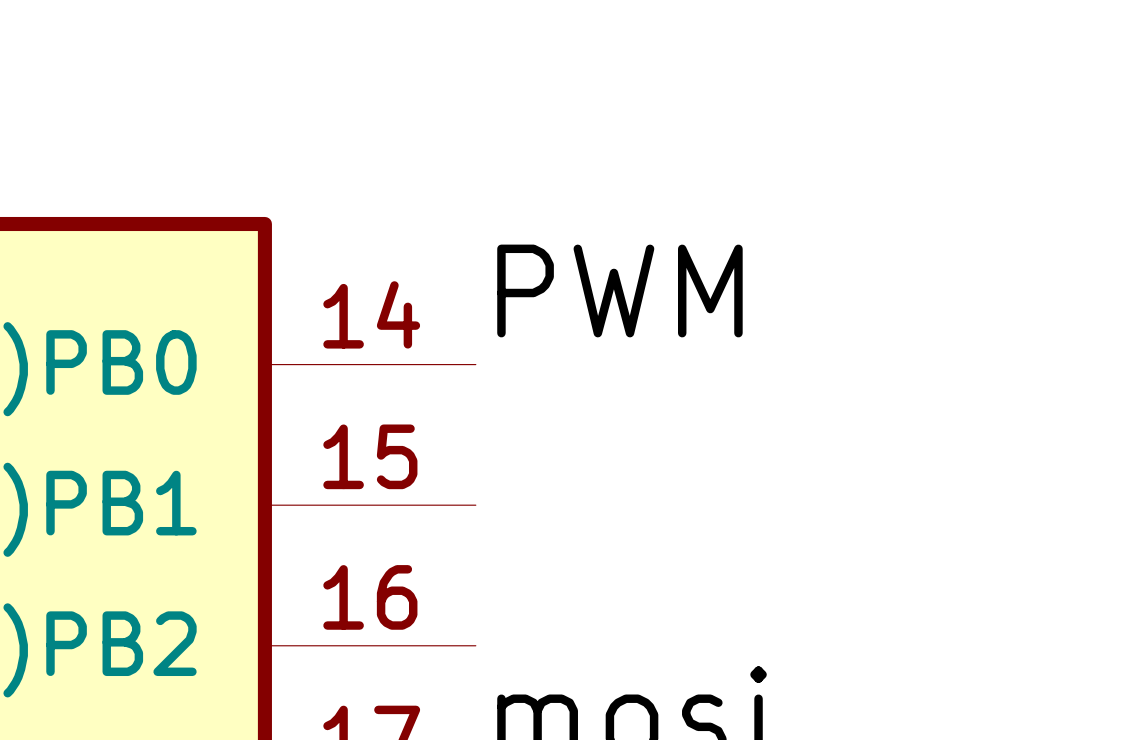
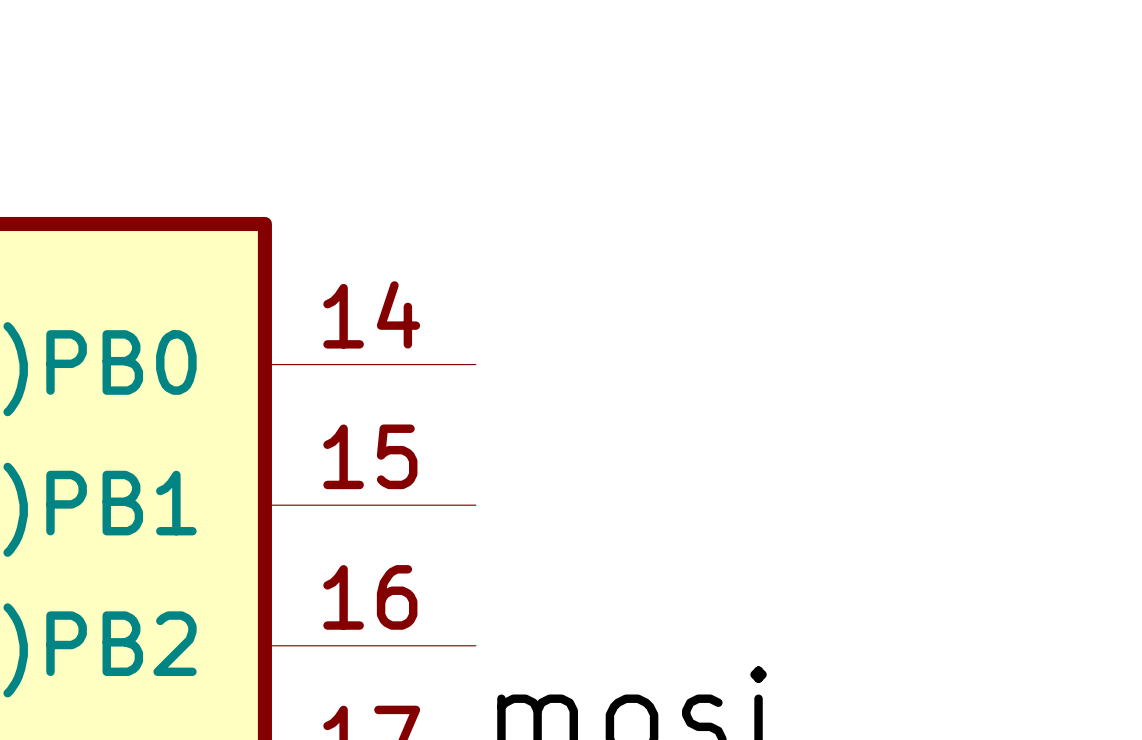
label: PWM (619, 291) -> none

